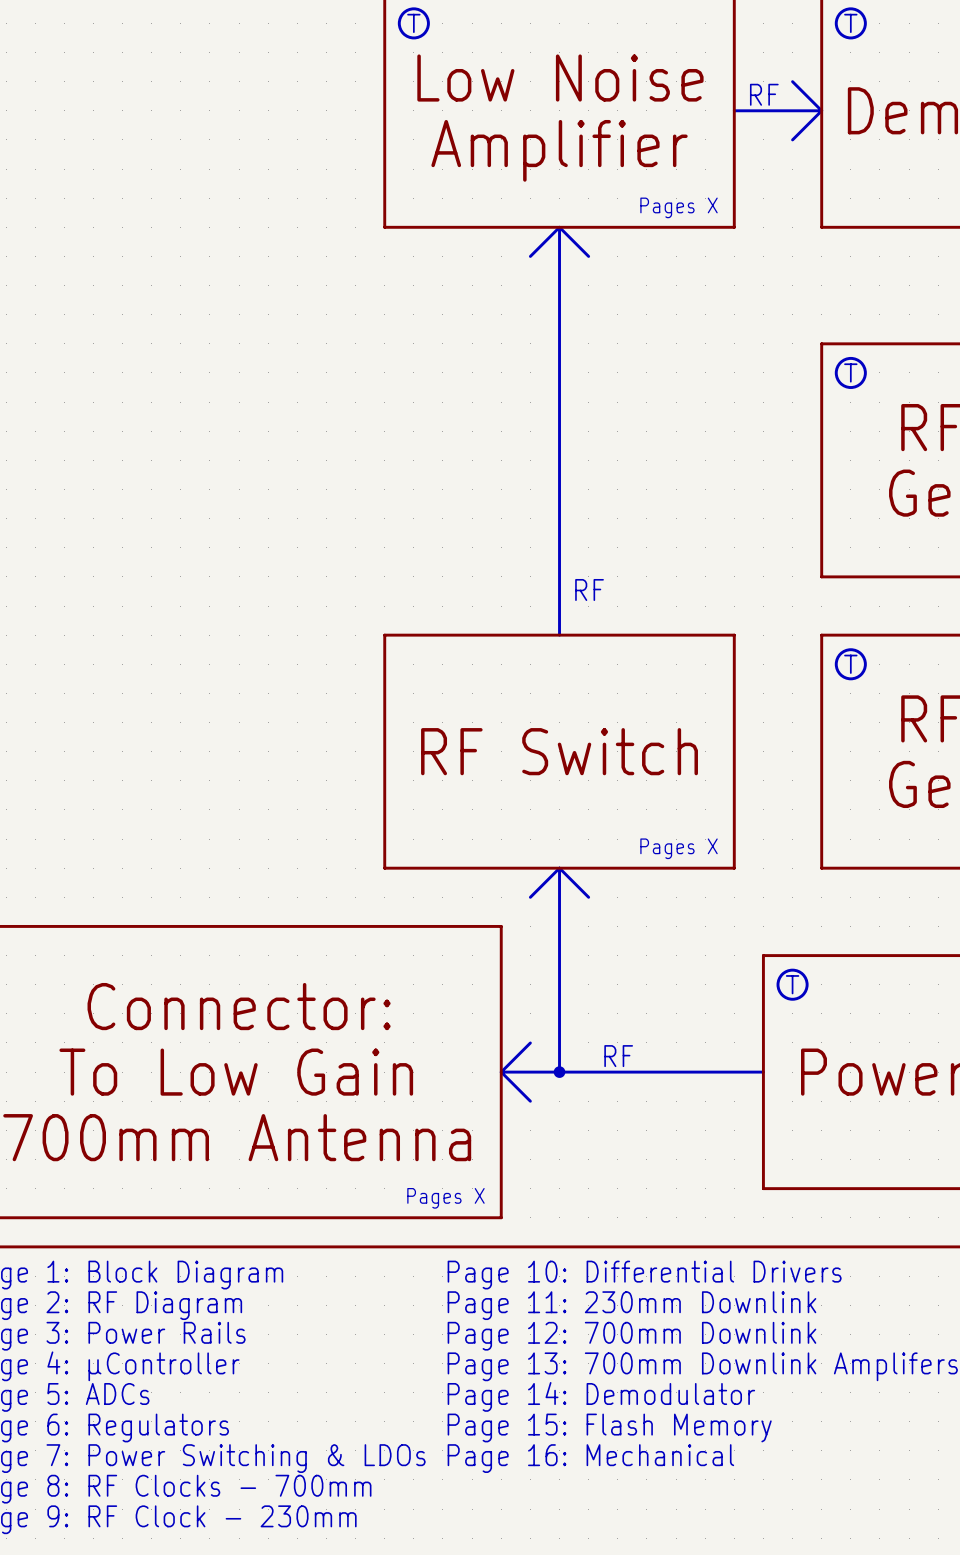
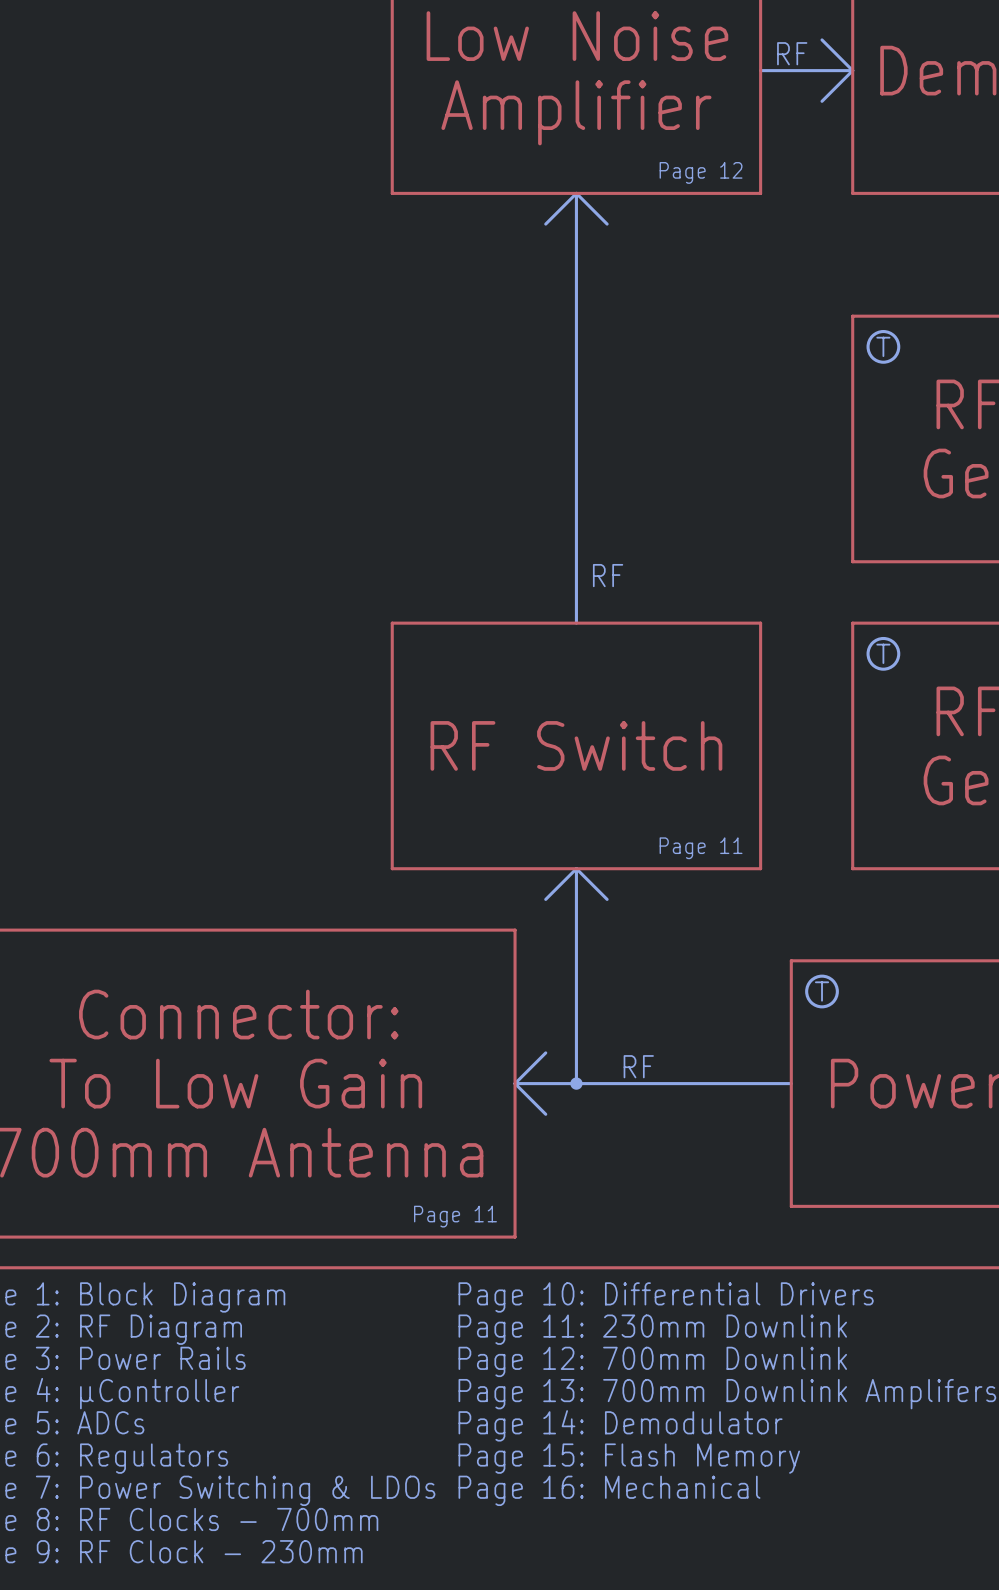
text: Pages X (679, 207) -> Page 12 (701, 172)
text: Pages X (679, 848) -> Page 11 (701, 848)
text: Pages X (445, 1198) -> Page 11 (455, 1216)

